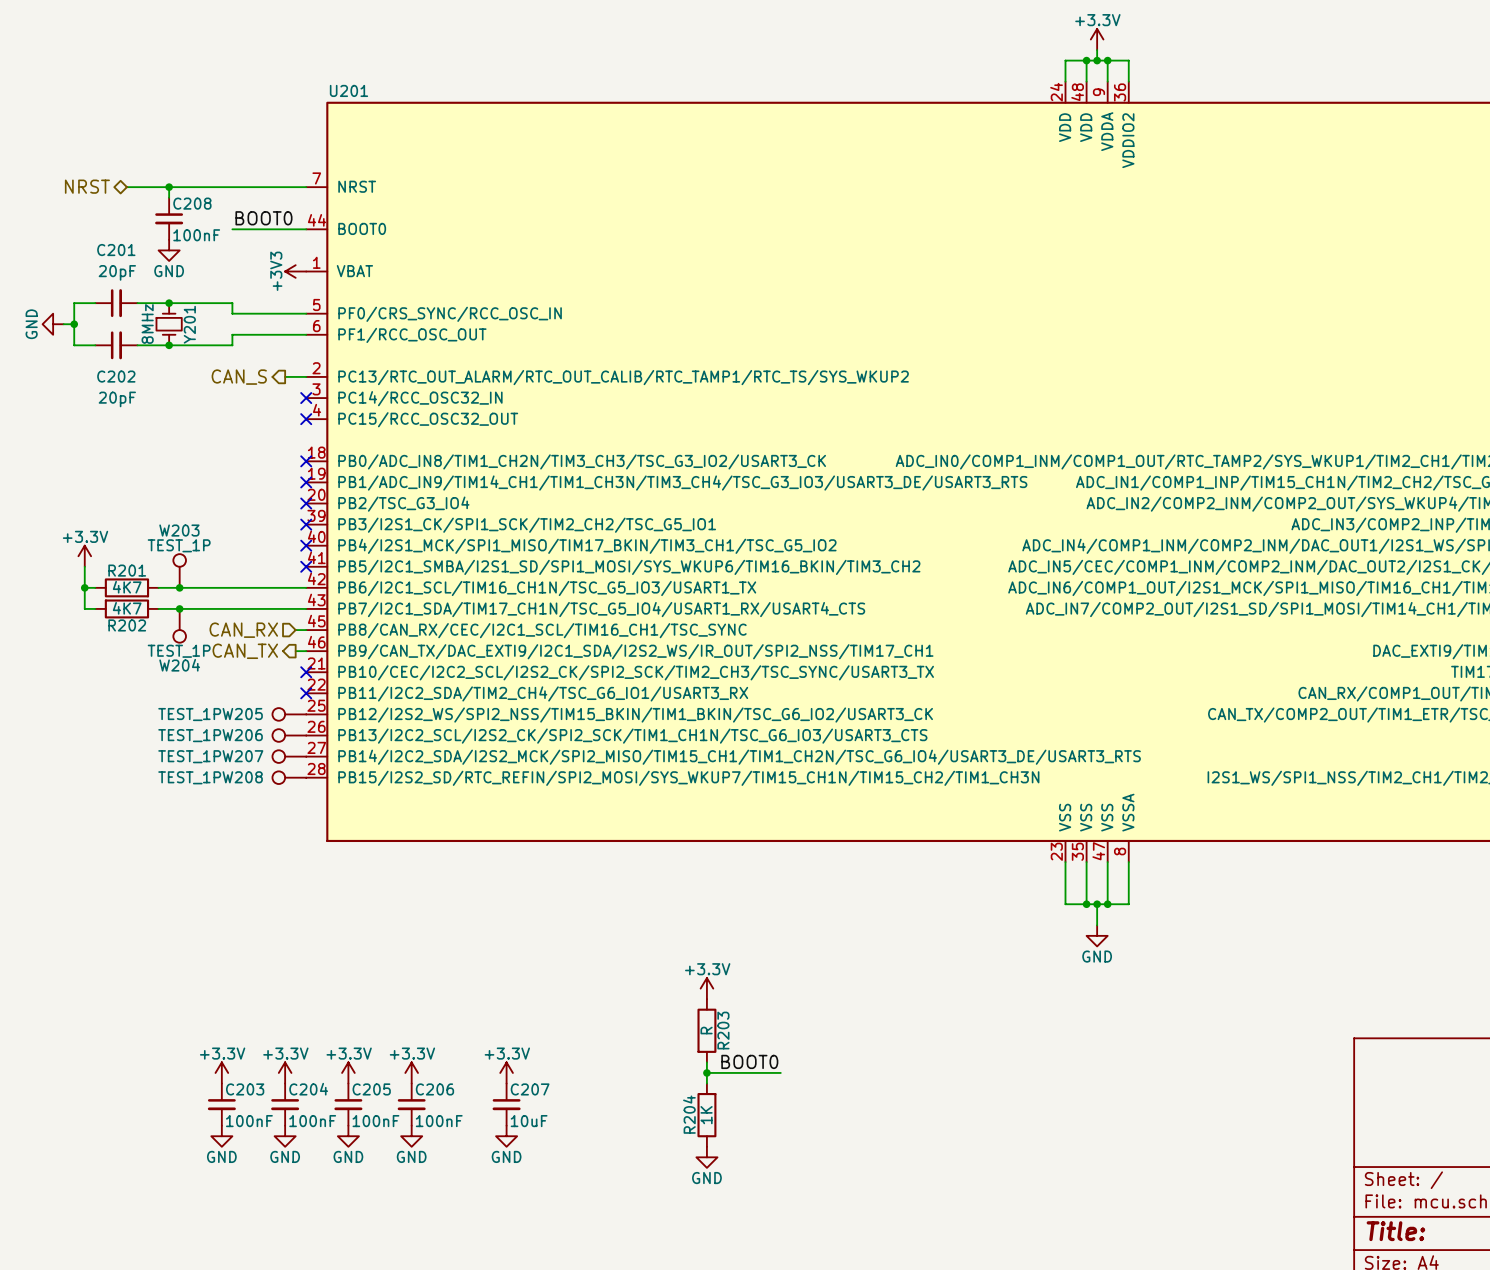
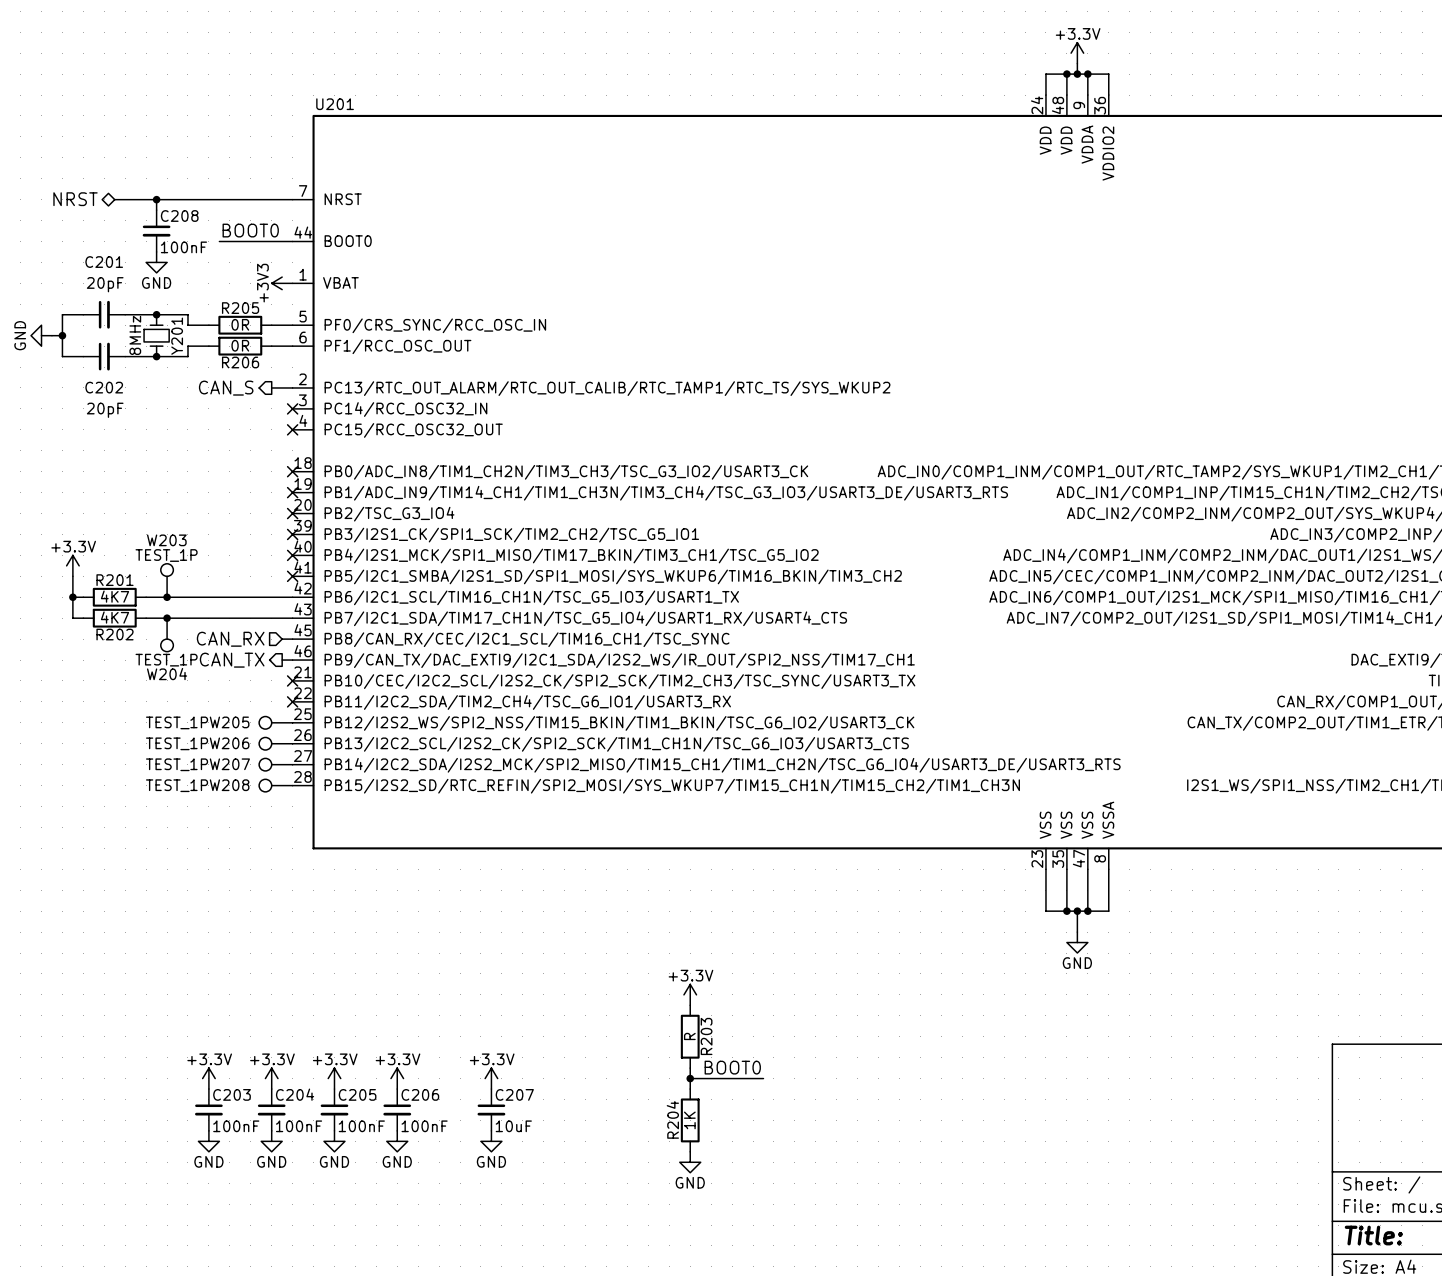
wire: (200, 303) (232, 303) (232, 313) (285, 313) -> (187, 314) (187, 325) (208, 325)
R205: none -> 0R (240, 325)
R206: none -> 0R (240, 346)
wire: (285, 334) (232, 334) (232, 345) (200, 345) -> (208, 346) (187, 346) (187, 356)

